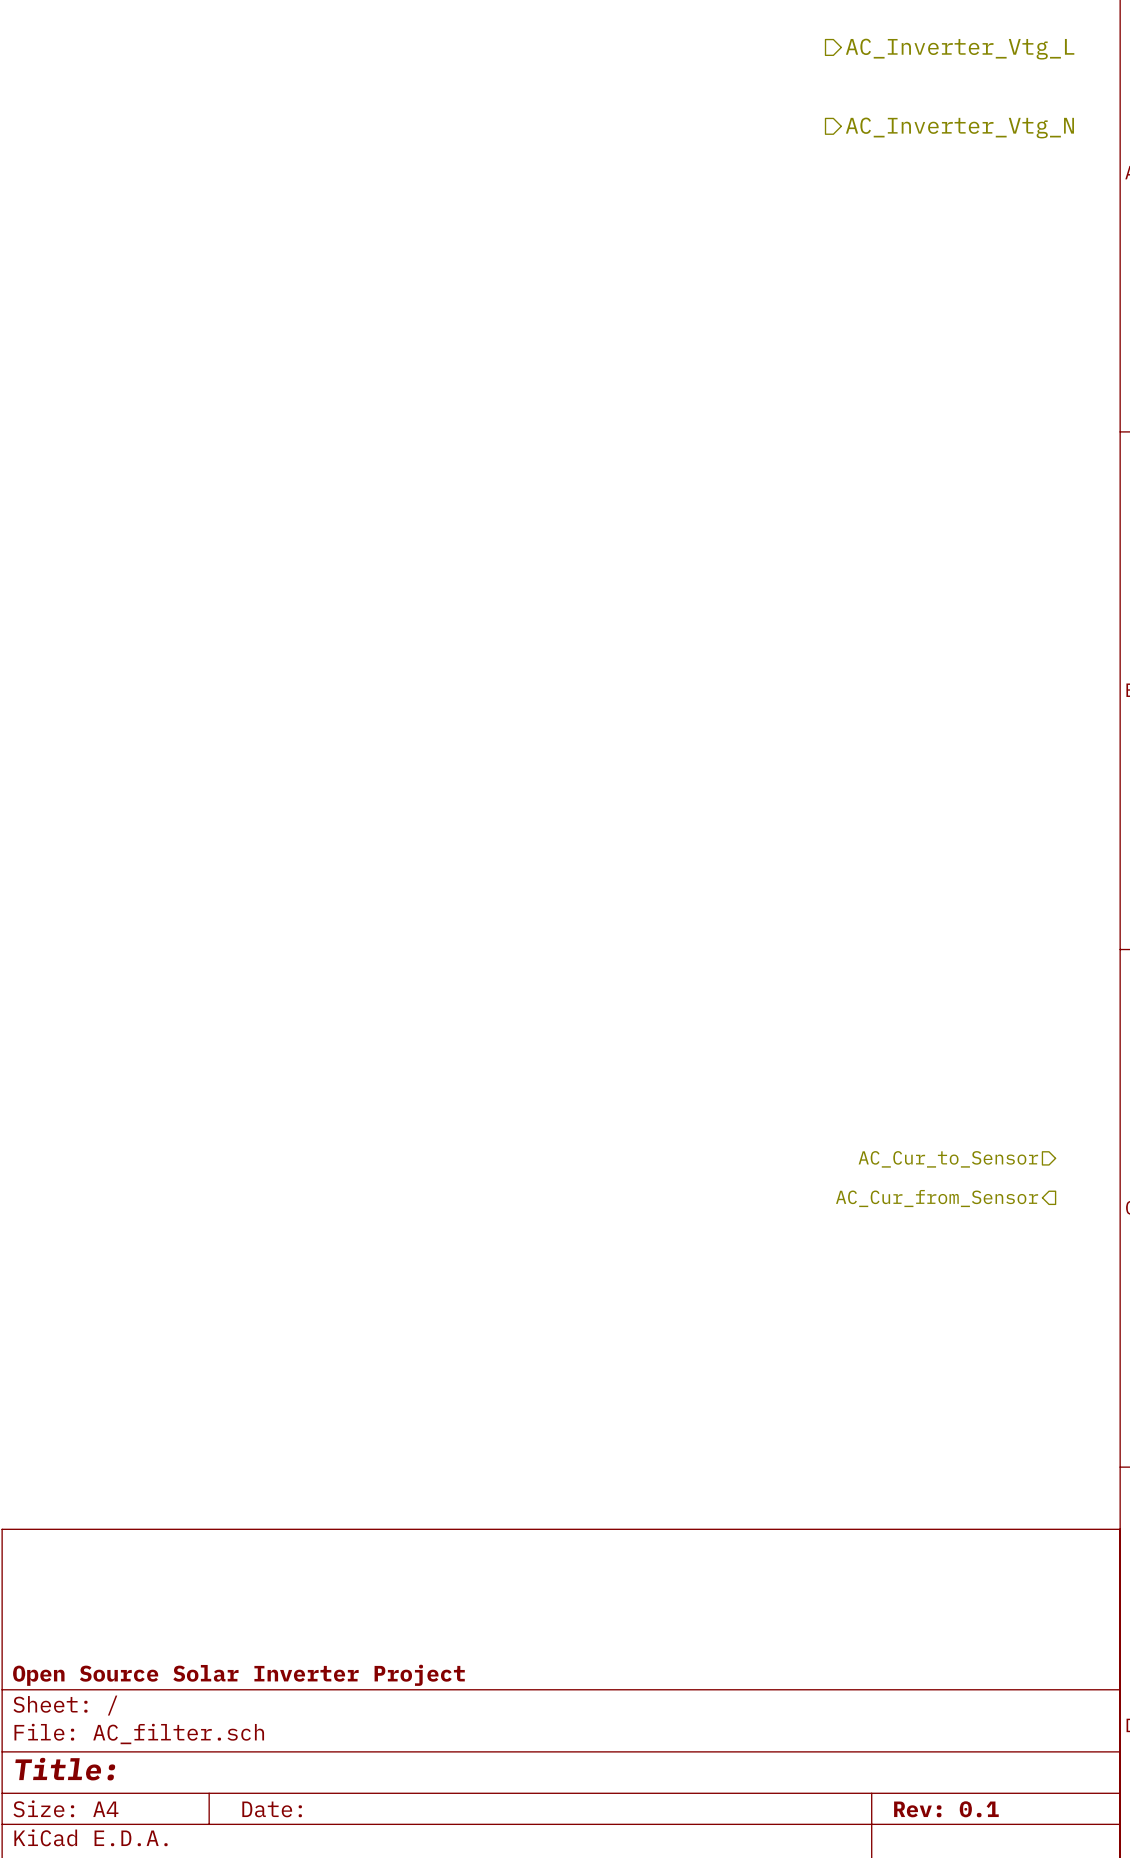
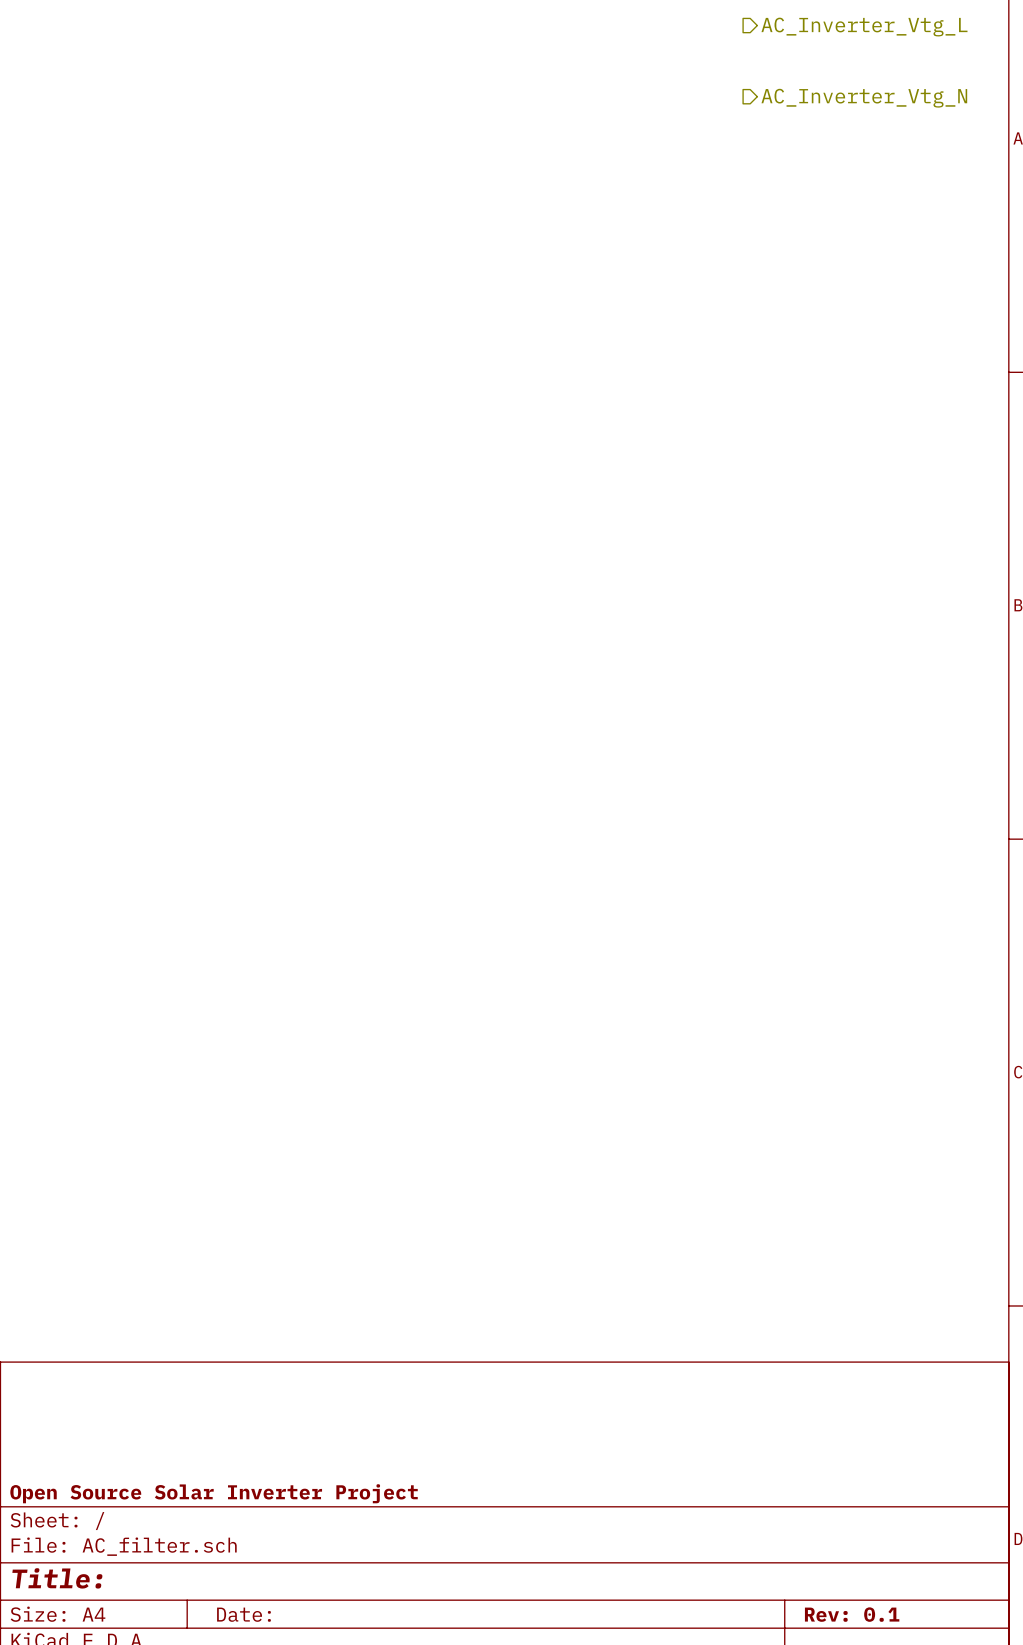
hierarchical label: AC_Cur_to_Sensor (948, 1159) -> none
hierarchical label: AC_Cur_from_Sensor (937, 1198) -> none

